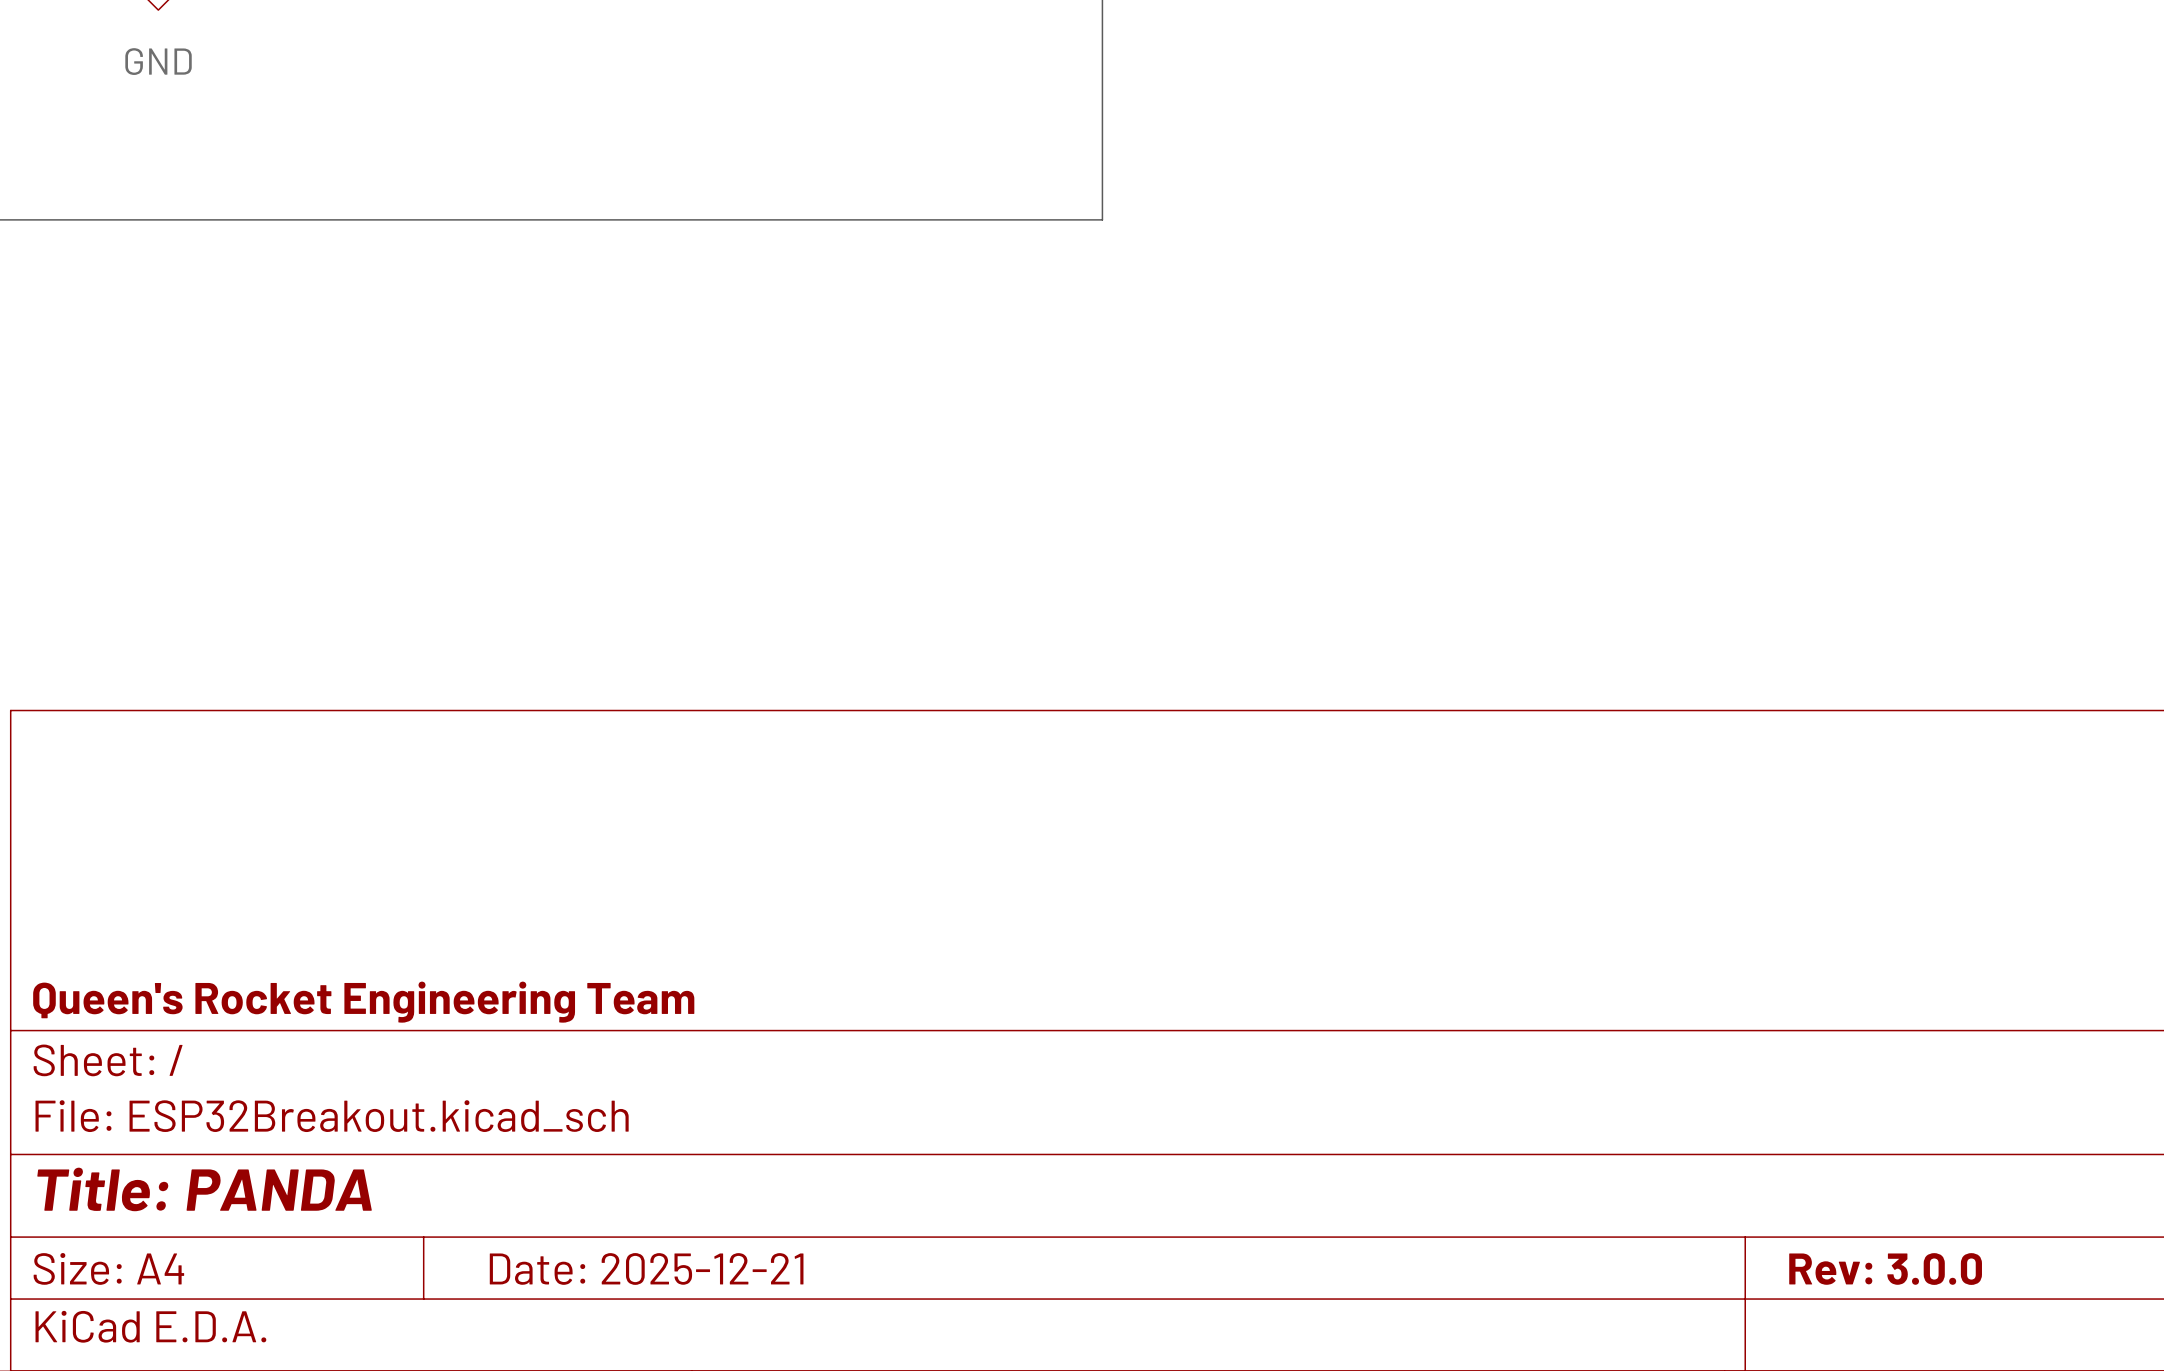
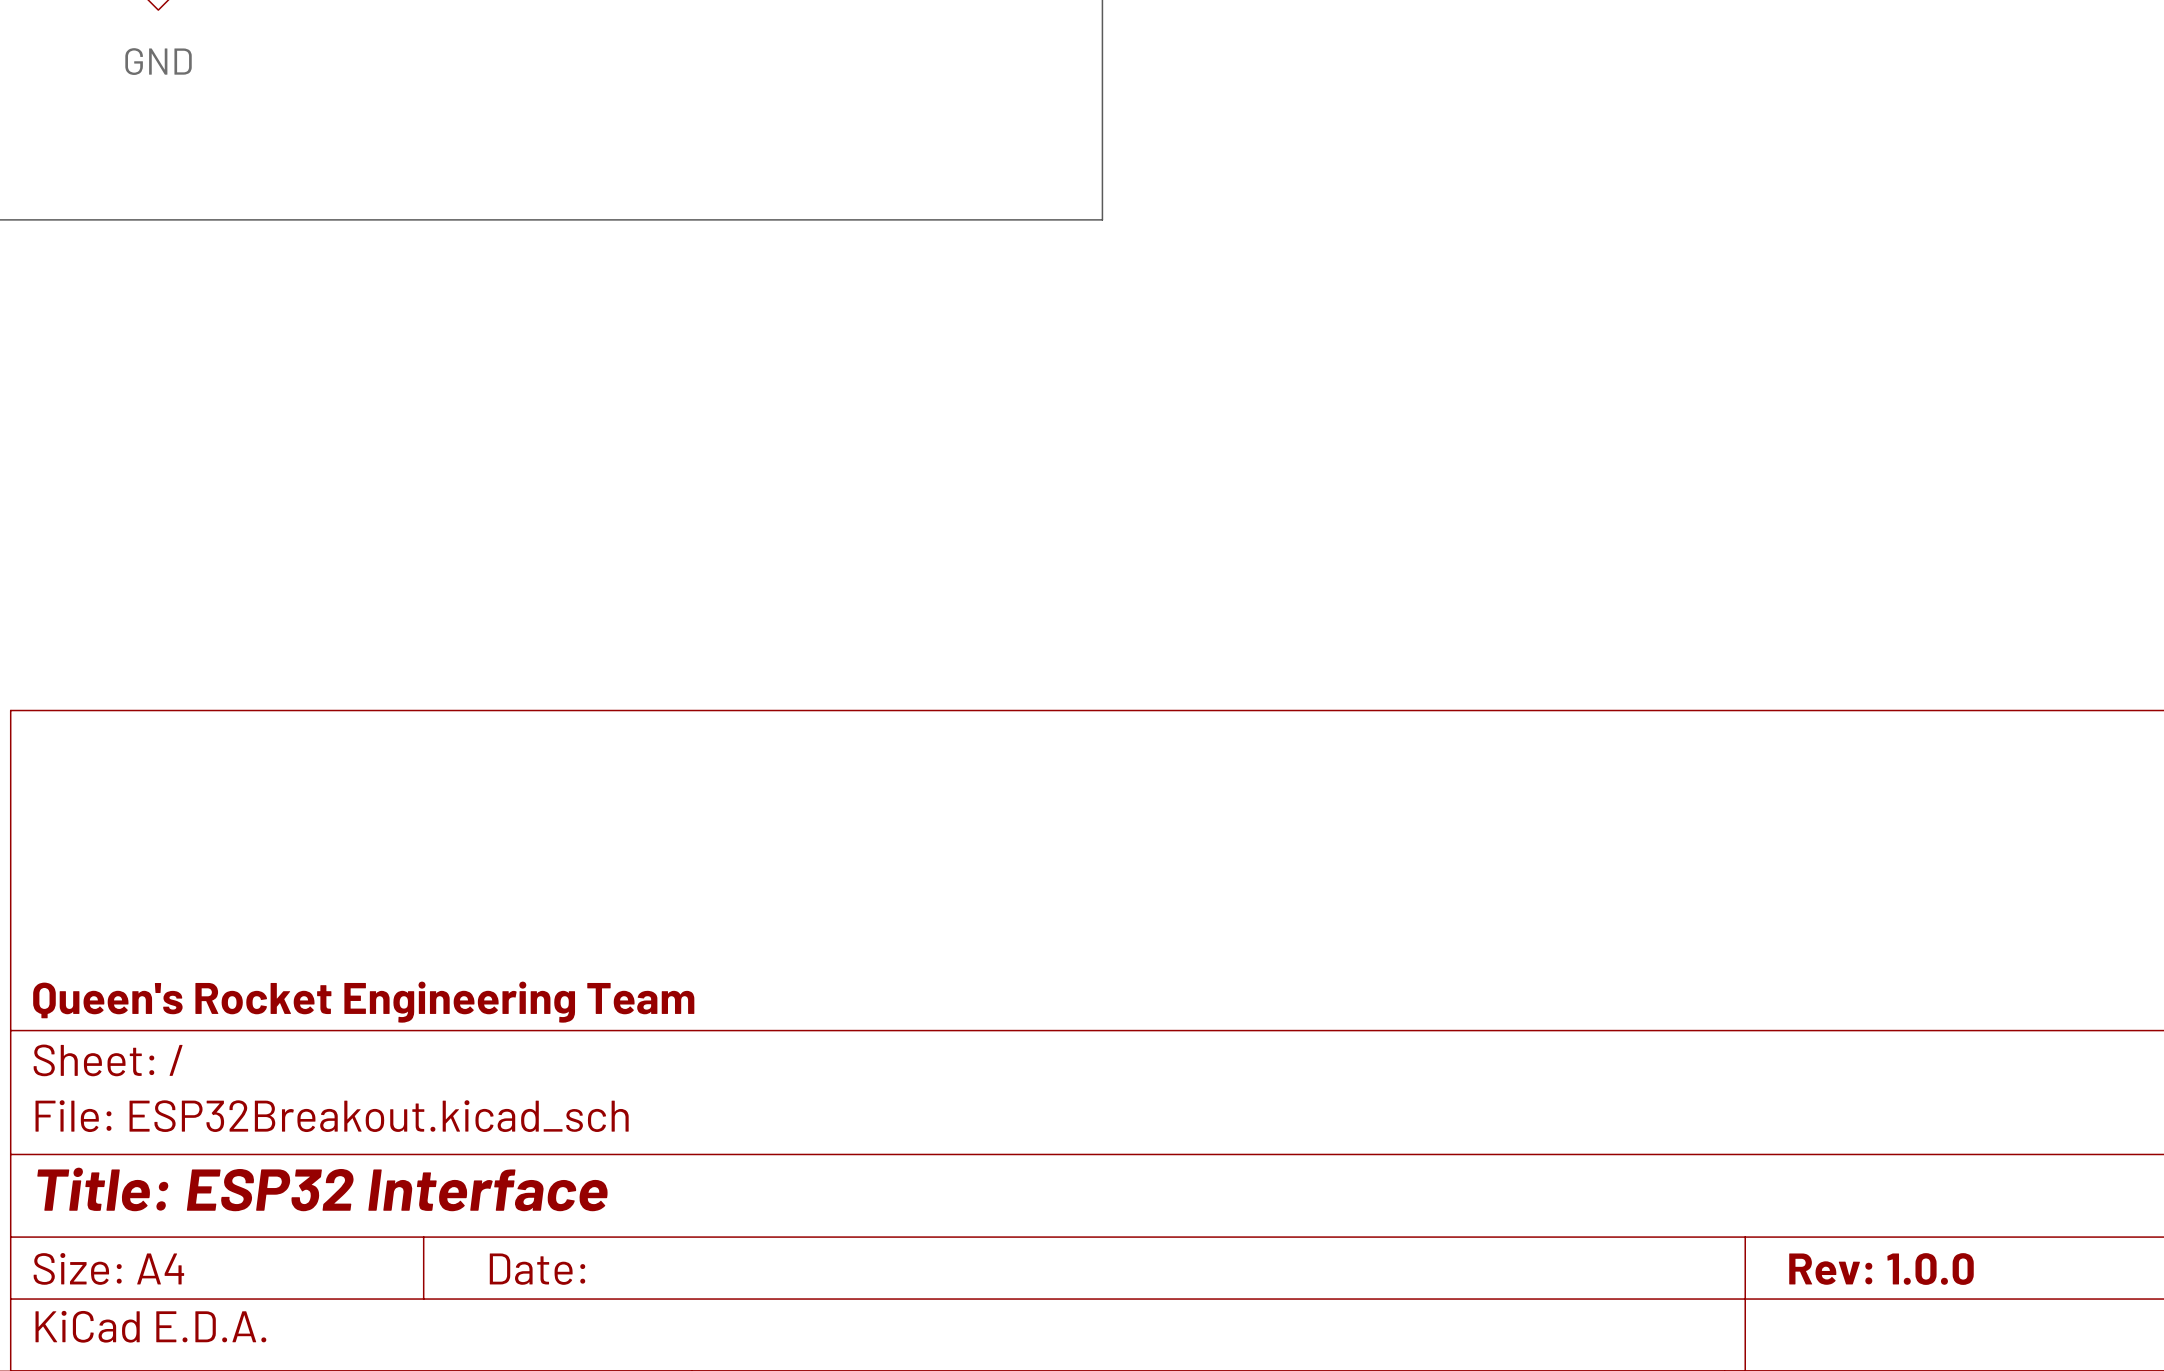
title block: Title: PANDA (204, 1189) -> Title: ESP32 Interface (322, 1189)
title block: Date: 2025-12-21 (646, 1268) -> Date: (537, 1269)
title block: Rev: 3.0.0 (1885, 1269) -> Rev: 1.0.0 (1881, 1269)

